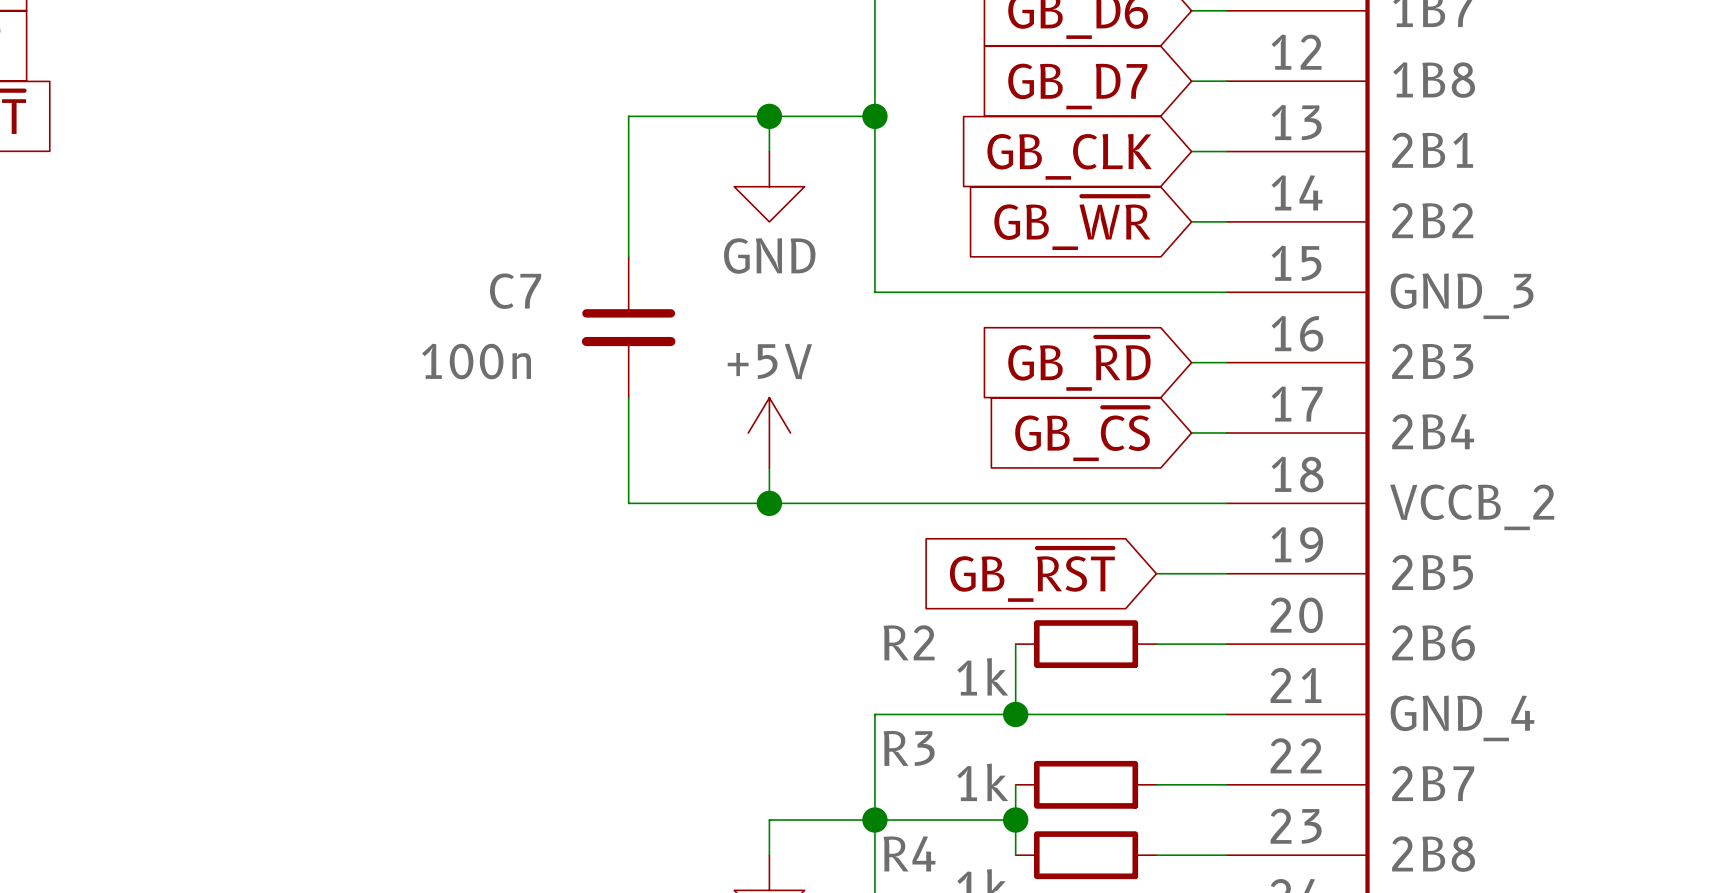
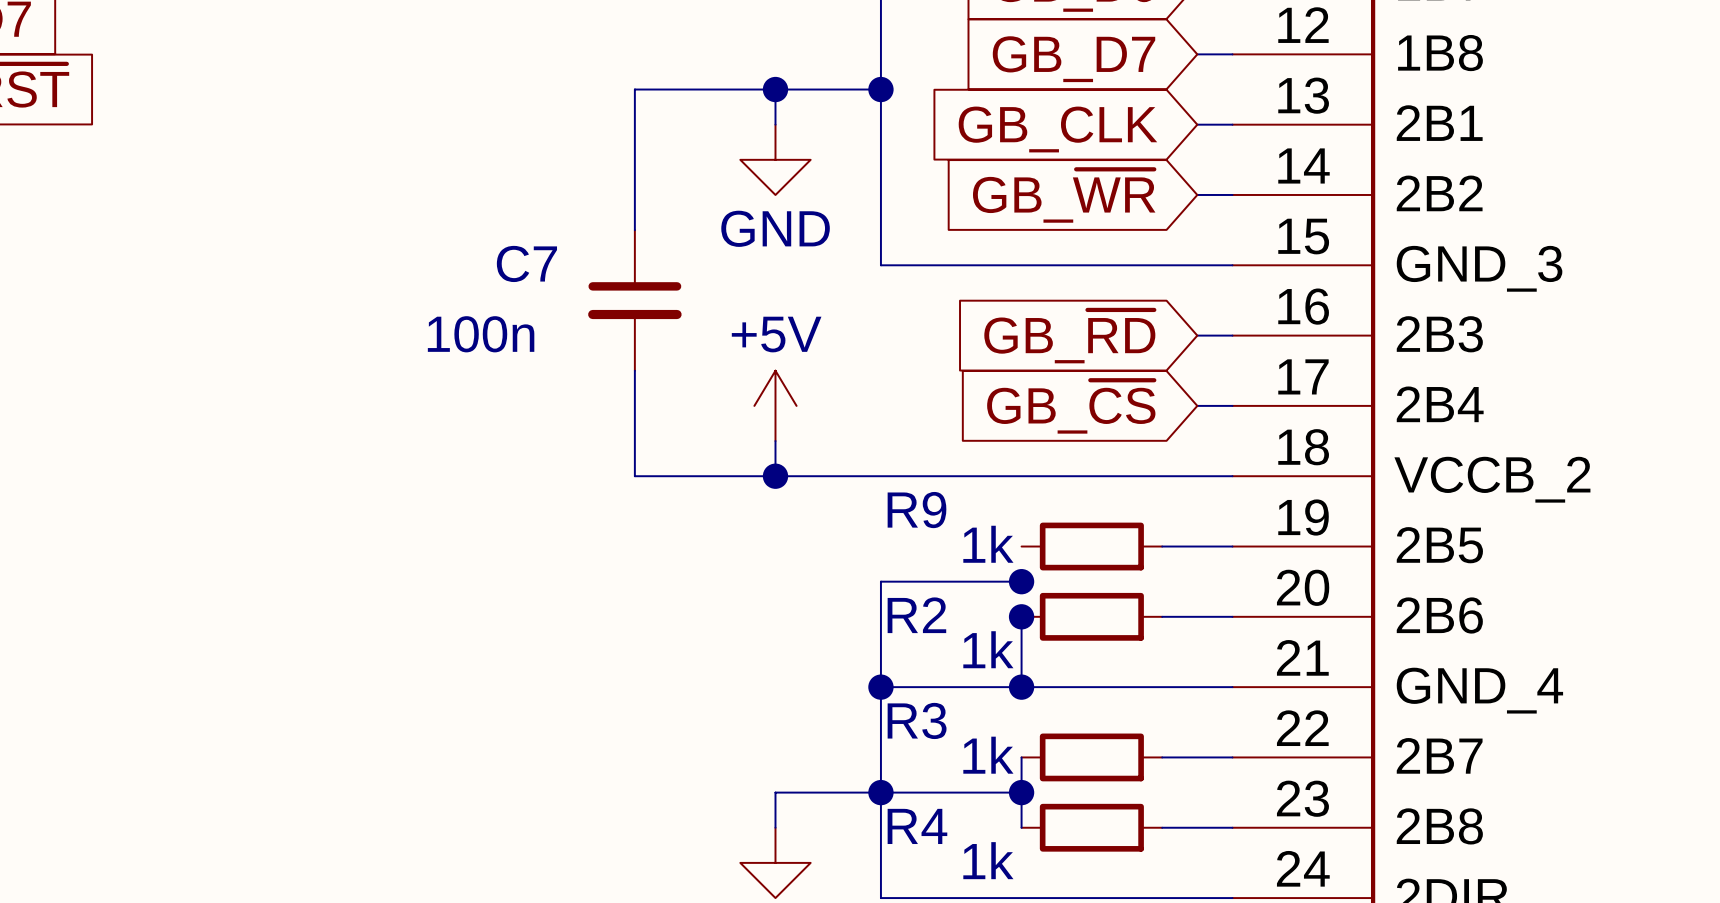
R9: none -> 1k (1091, 546)
global label: GB_~{RST} (1032, 574) -> none
wire: none -> (1021, 581) (880, 581) (880, 687)
junction: none -> (1021, 581)
junction: none -> (1021, 616)
junction: none -> (880, 687)

